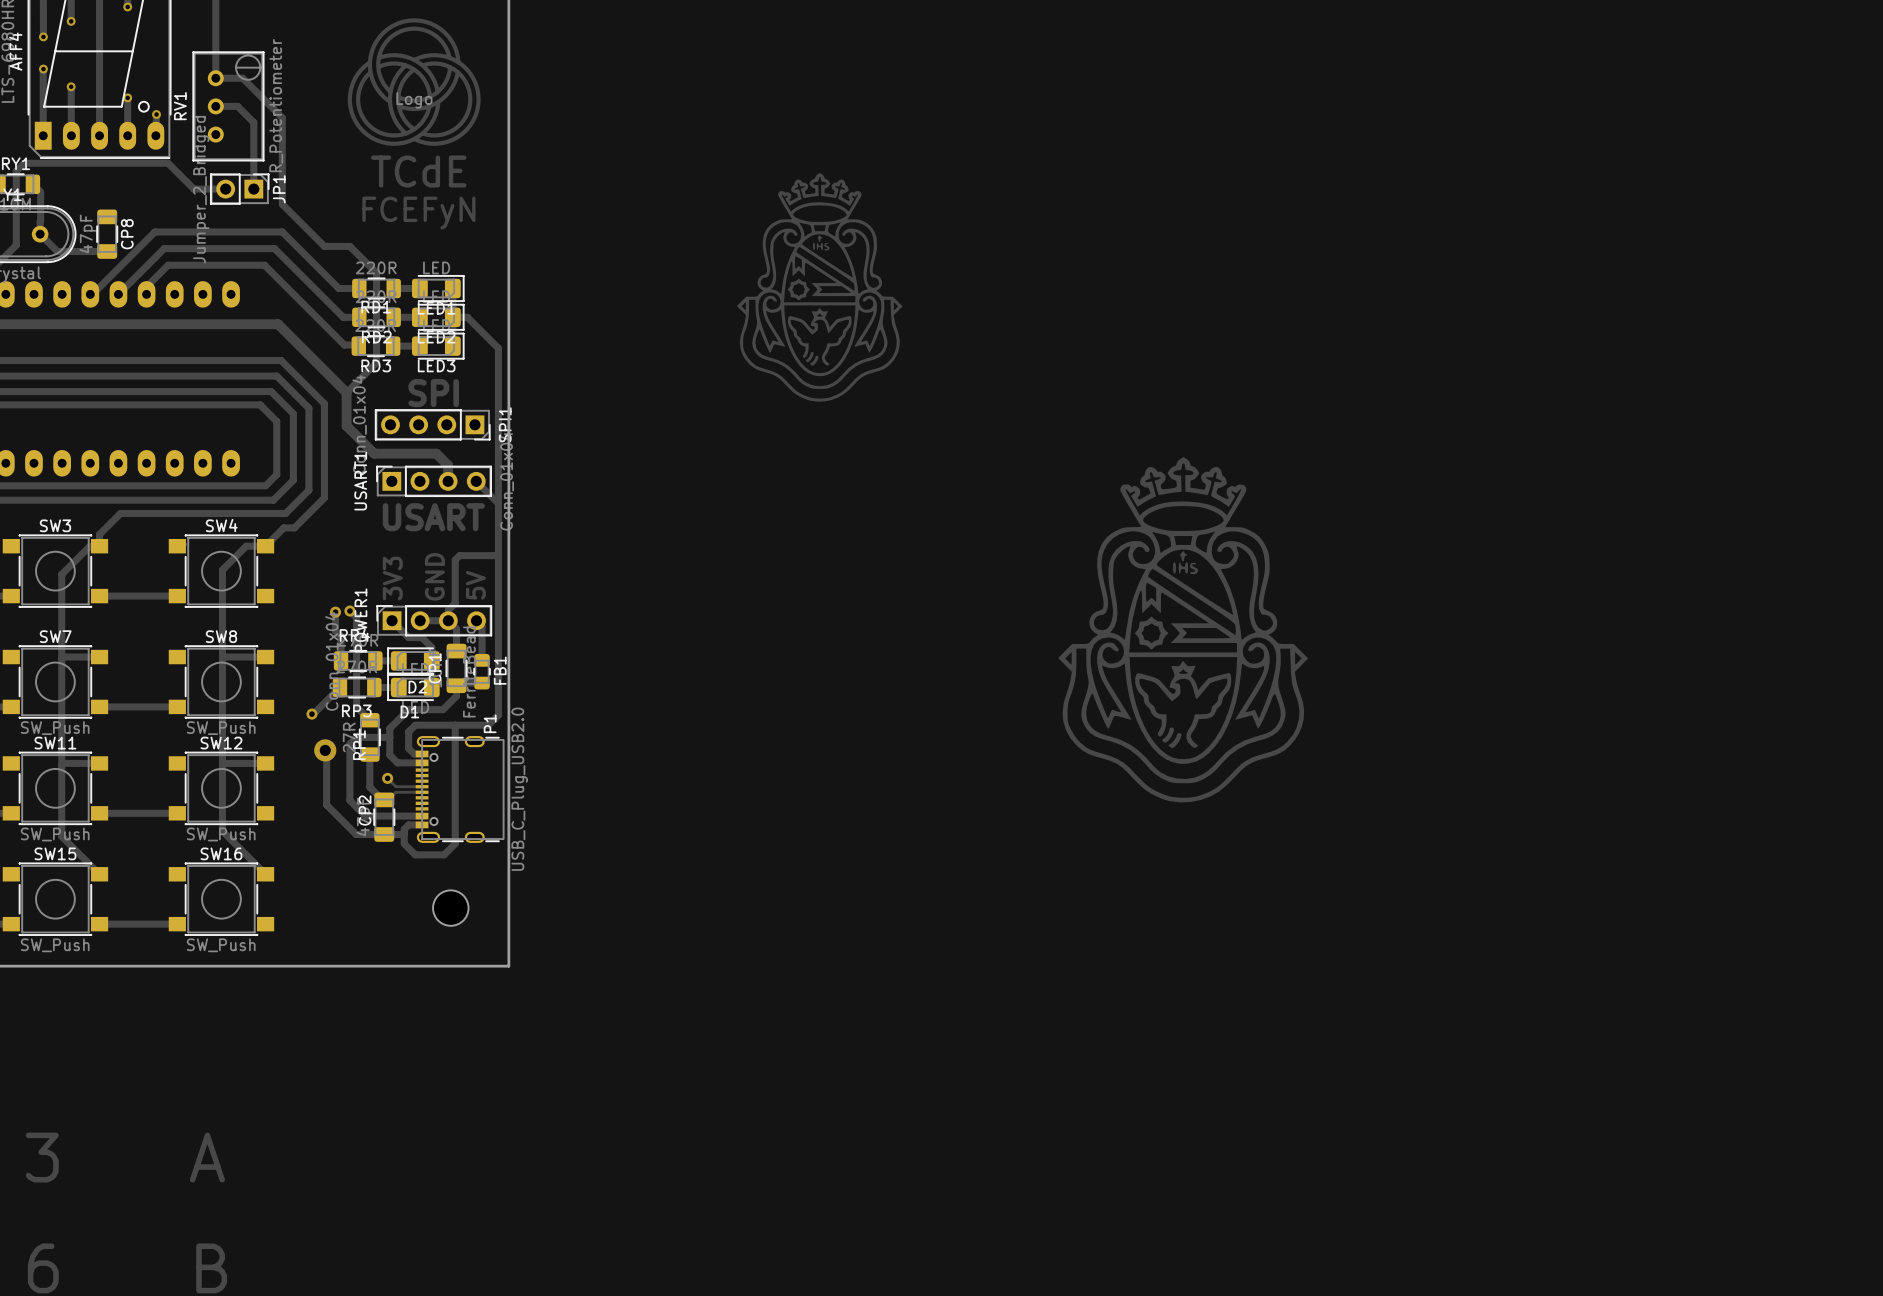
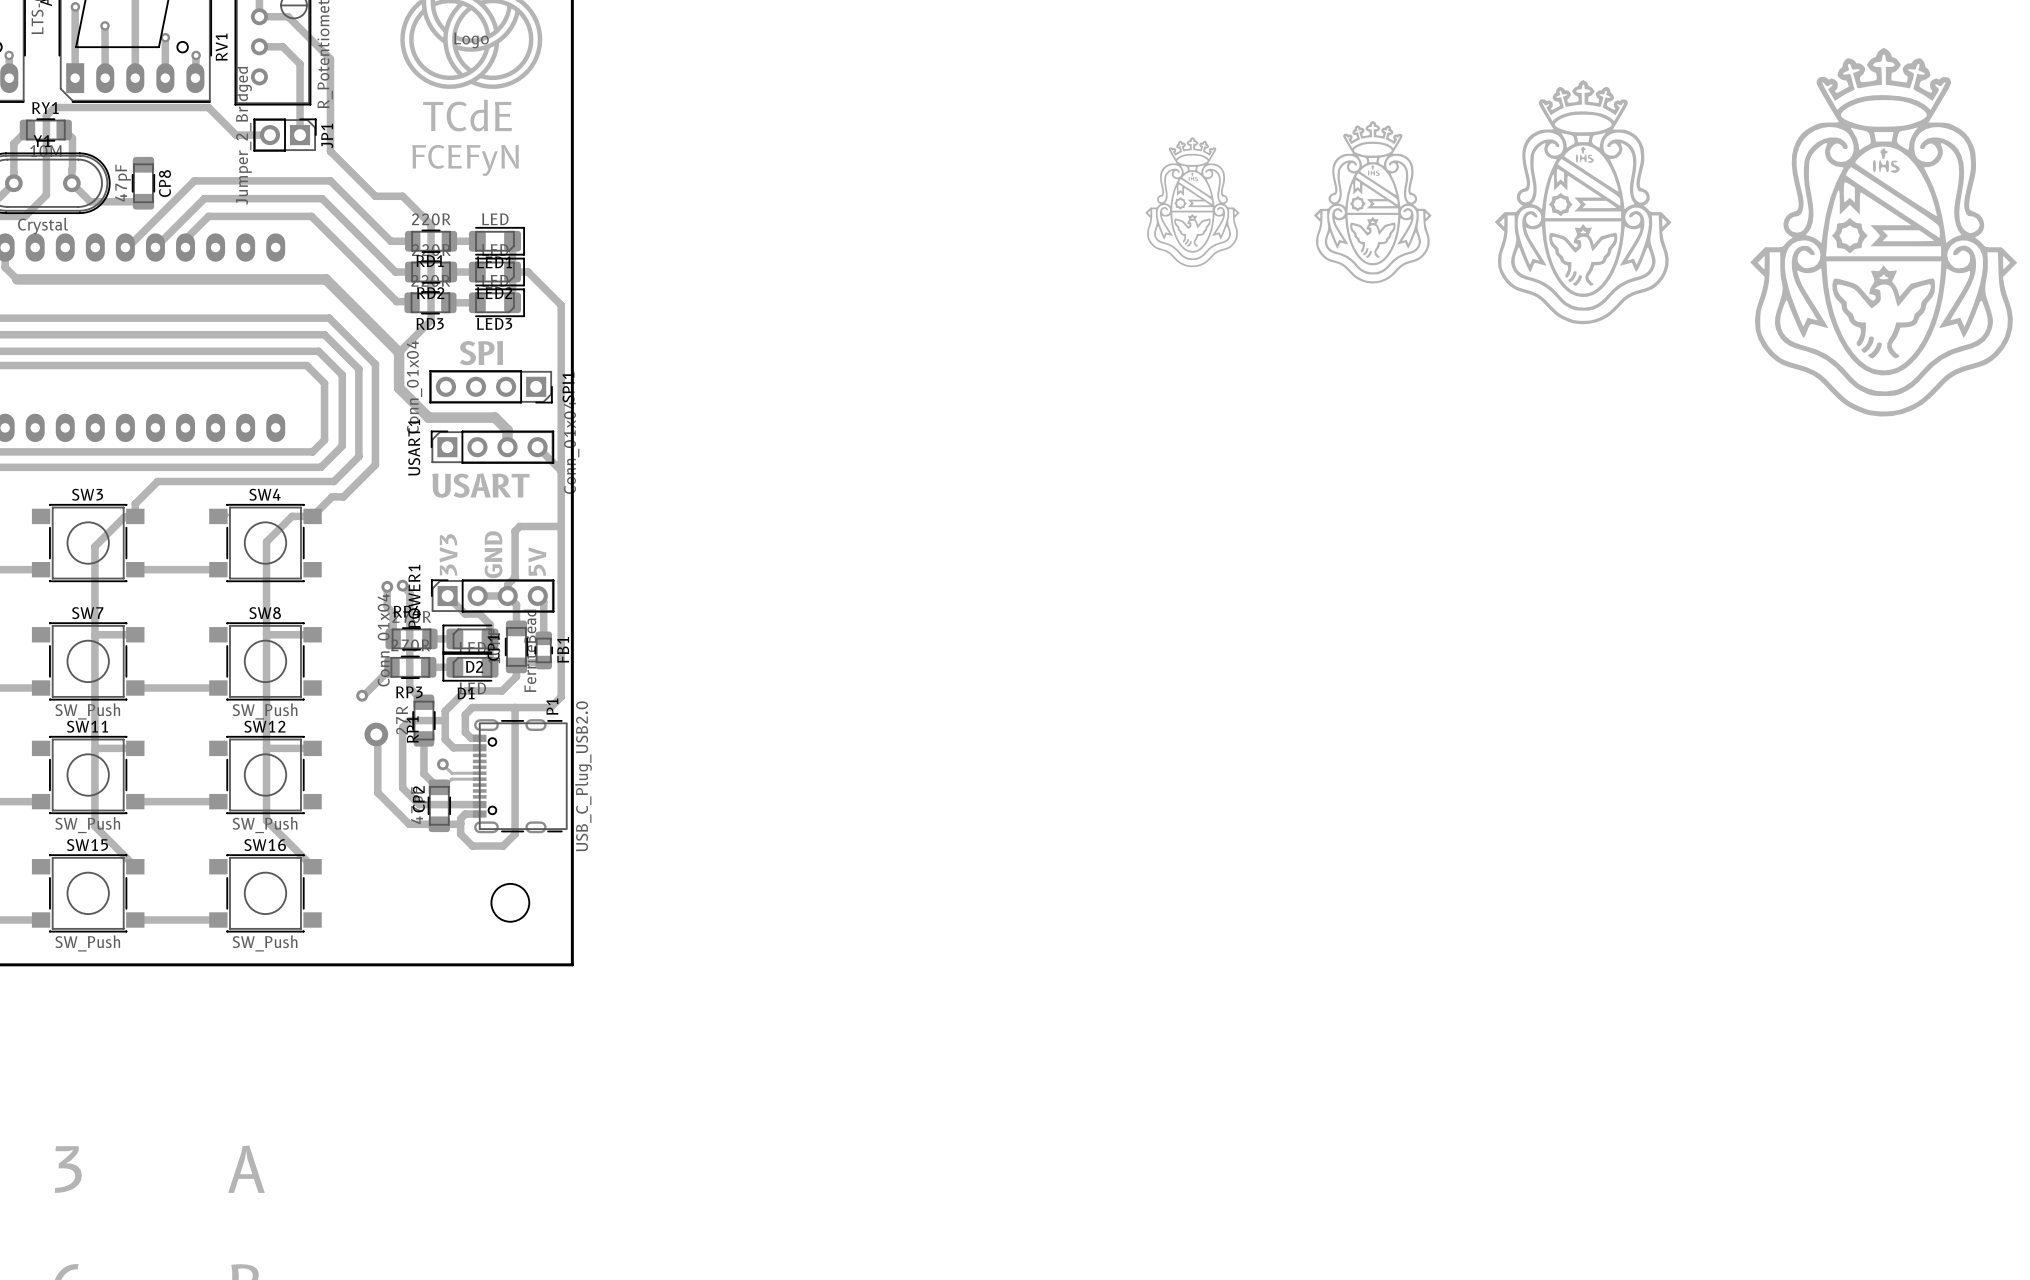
drawing: none -> [1750, 47, 2018, 417]
drawing: none -> [1494, 79, 1672, 325]
drawing: [736, 172, 903, 402] -> none
drawing: none -> [1313, 120, 1432, 284]
drawing: none -> [1145, 137, 1240, 268]
drawing: [1058, 457, 1309, 803] -> none

